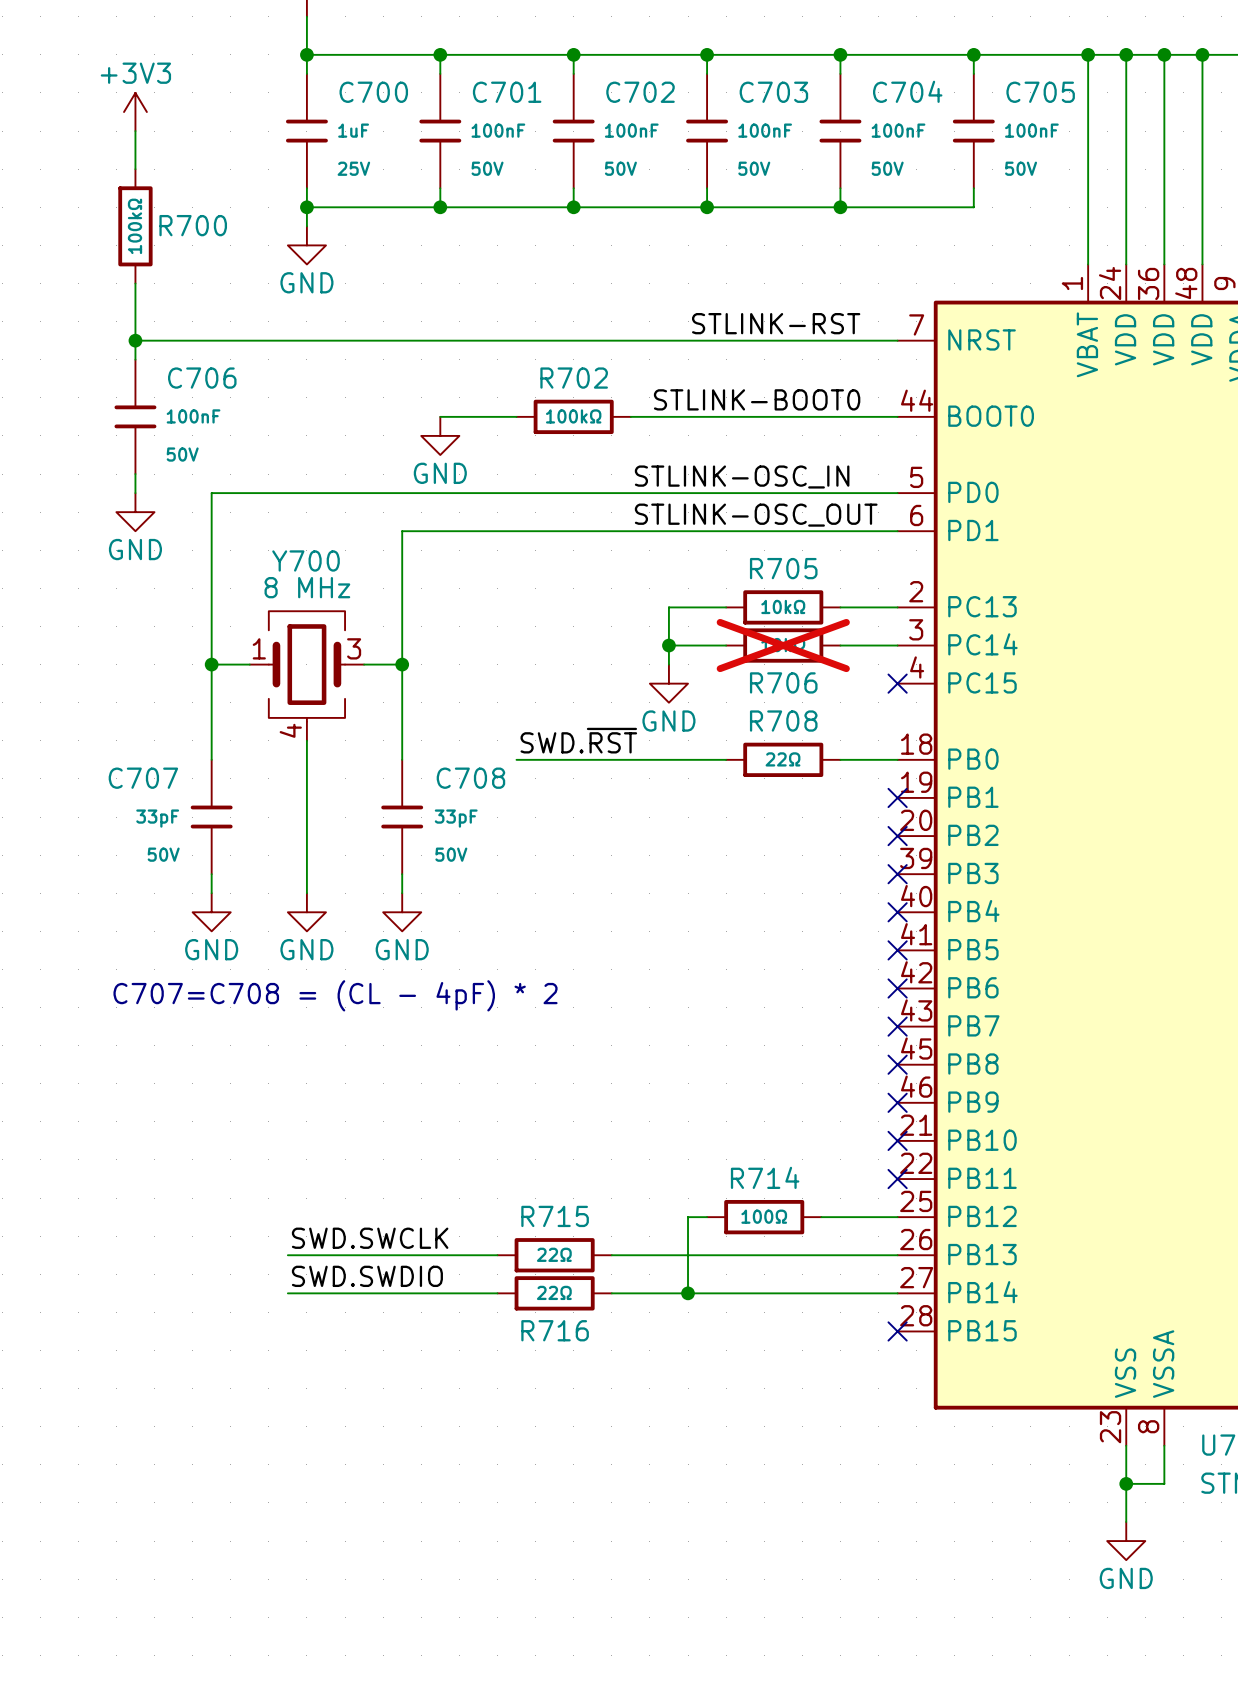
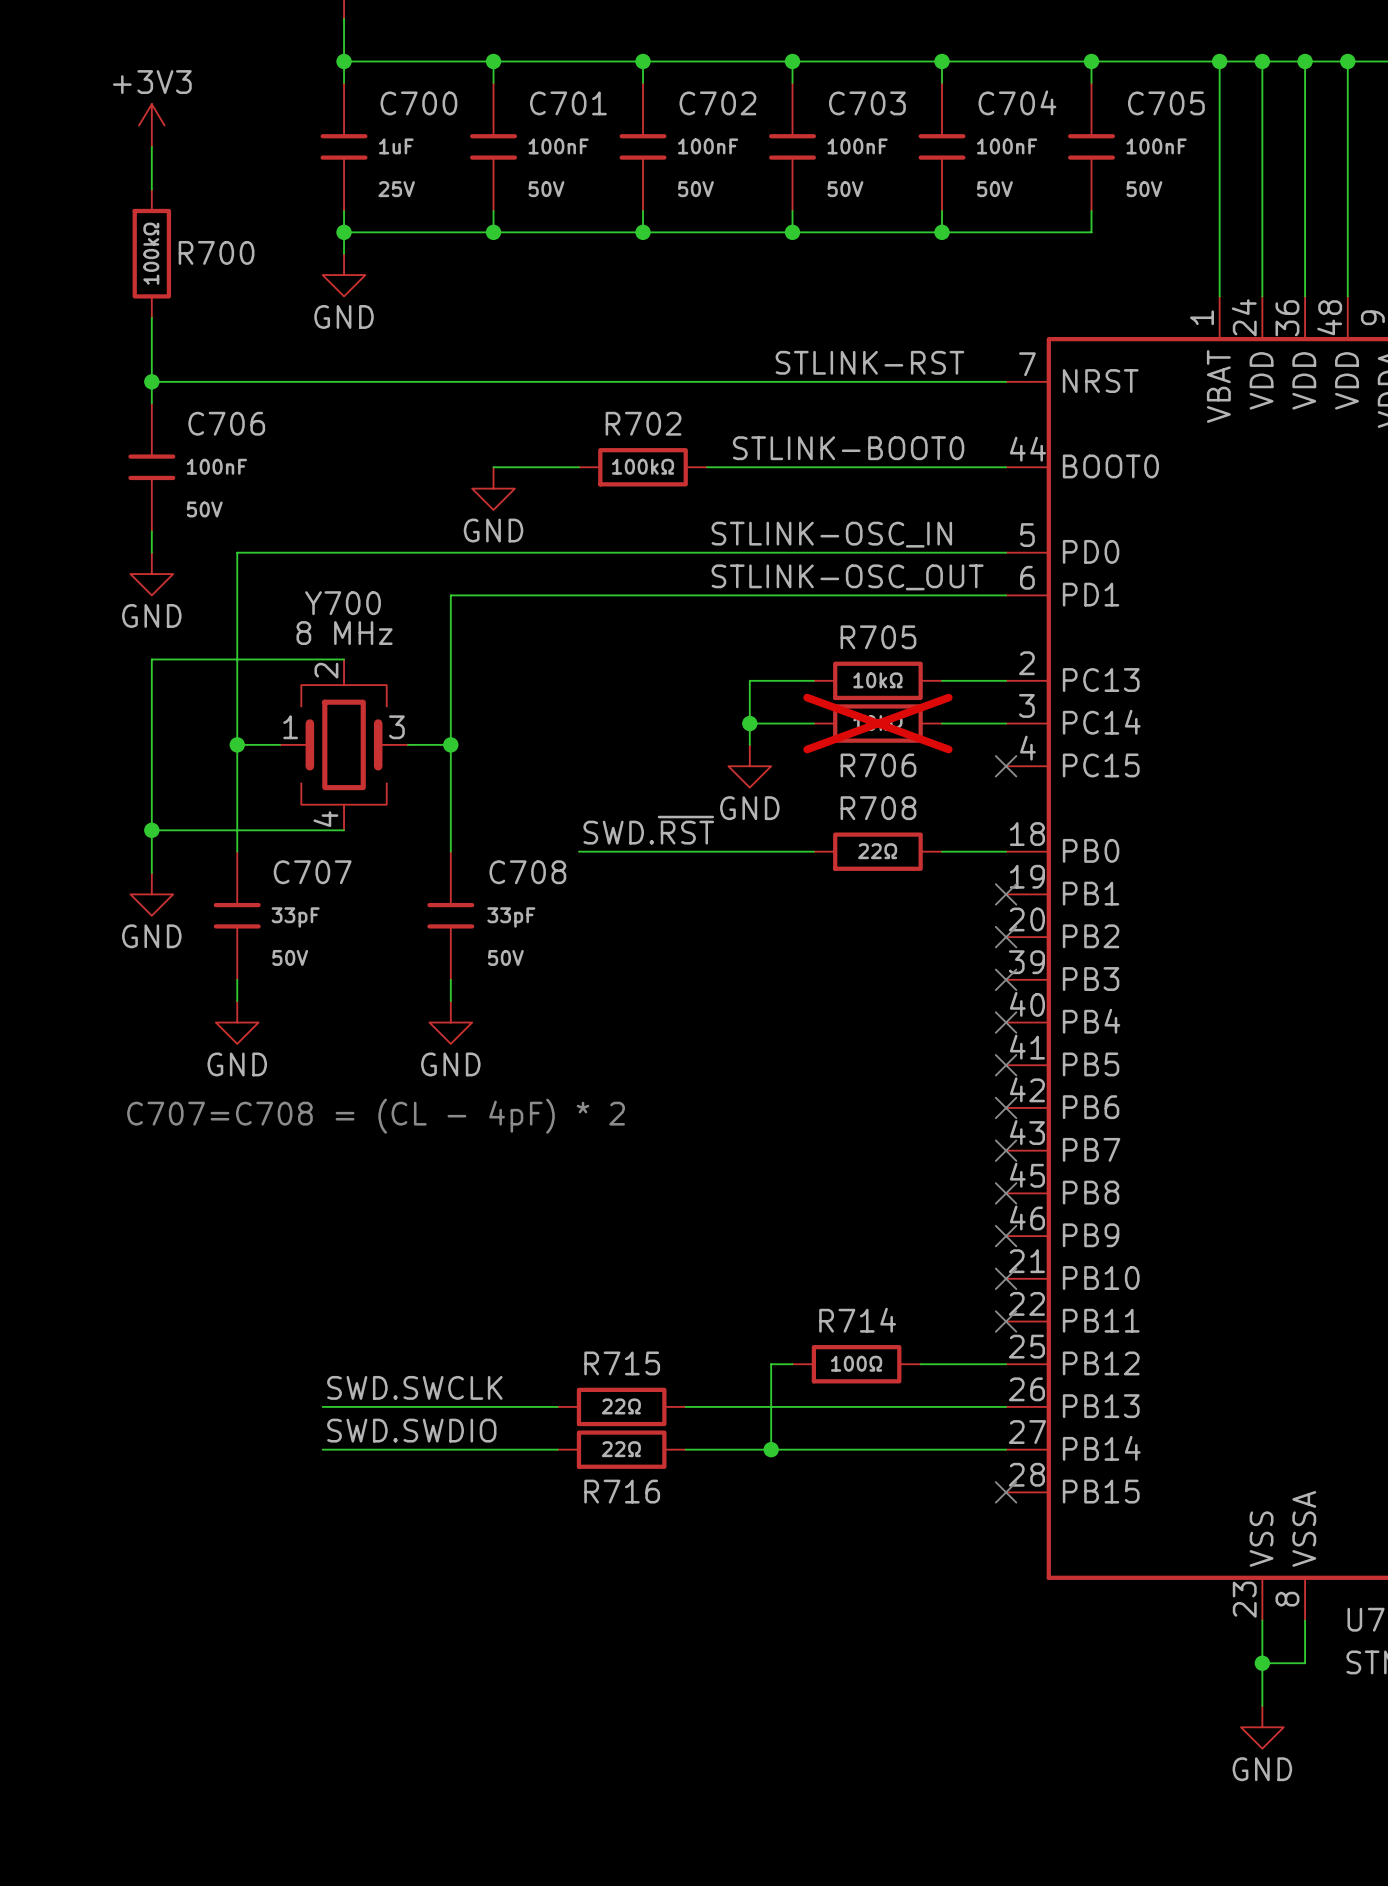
wire: none -> (344, 659) (151, 659) (151, 873)
Y700 symbol: [249, 611, 365, 741] -> [279, 659, 409, 831]
junction: none -> (151, 830)
wire: (306, 740) (306, 893) -> (344, 830) (151, 830)
C707 name position: C707 (143, 778) -> C707 (312, 872)
C707 value position: 33pF (157, 818) -> 33pF (295, 917)
C707 text position: 50V (163, 854) -> 50V (290, 957)
power symbol position: GND (306, 912) -> GND (151, 894)

